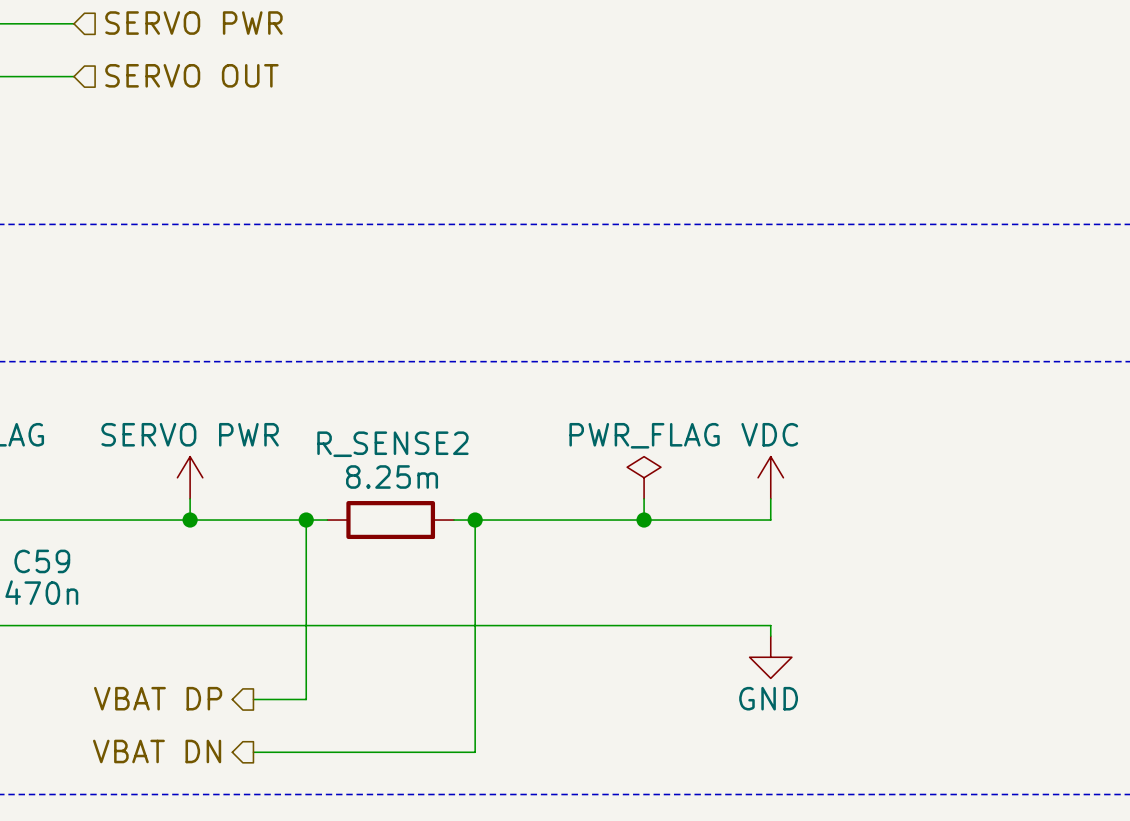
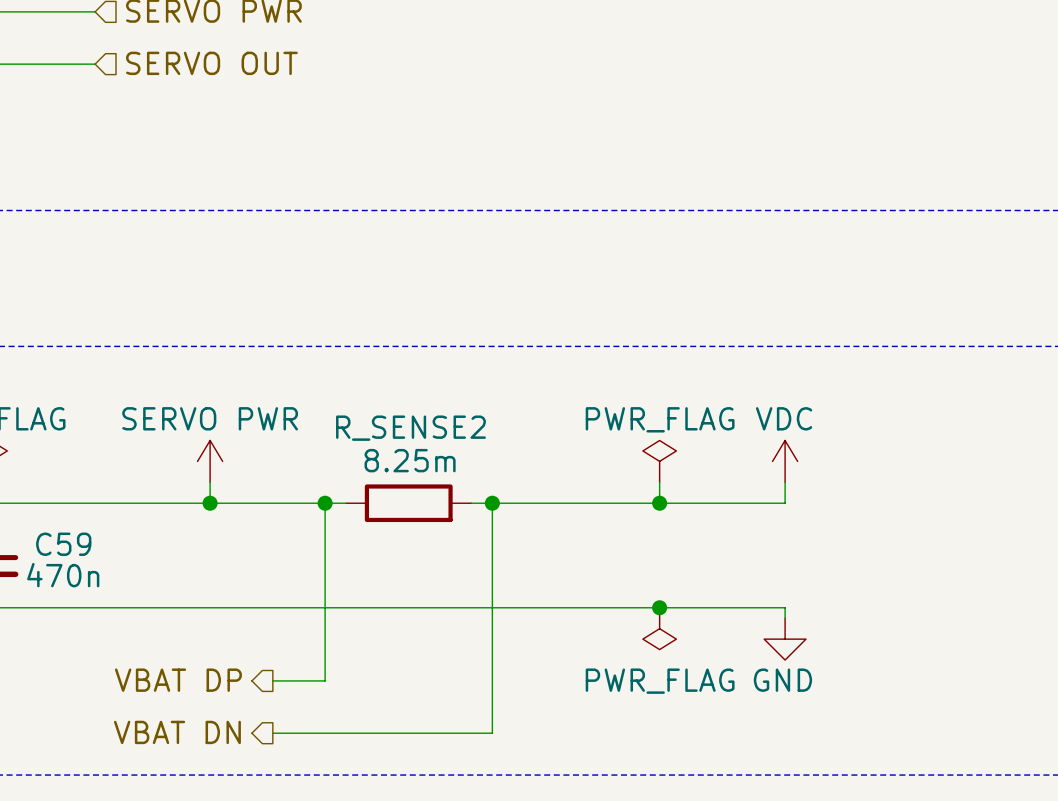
junction: none -> (659, 607)
power symbol: none -> PWR_FLAG (659, 628)

